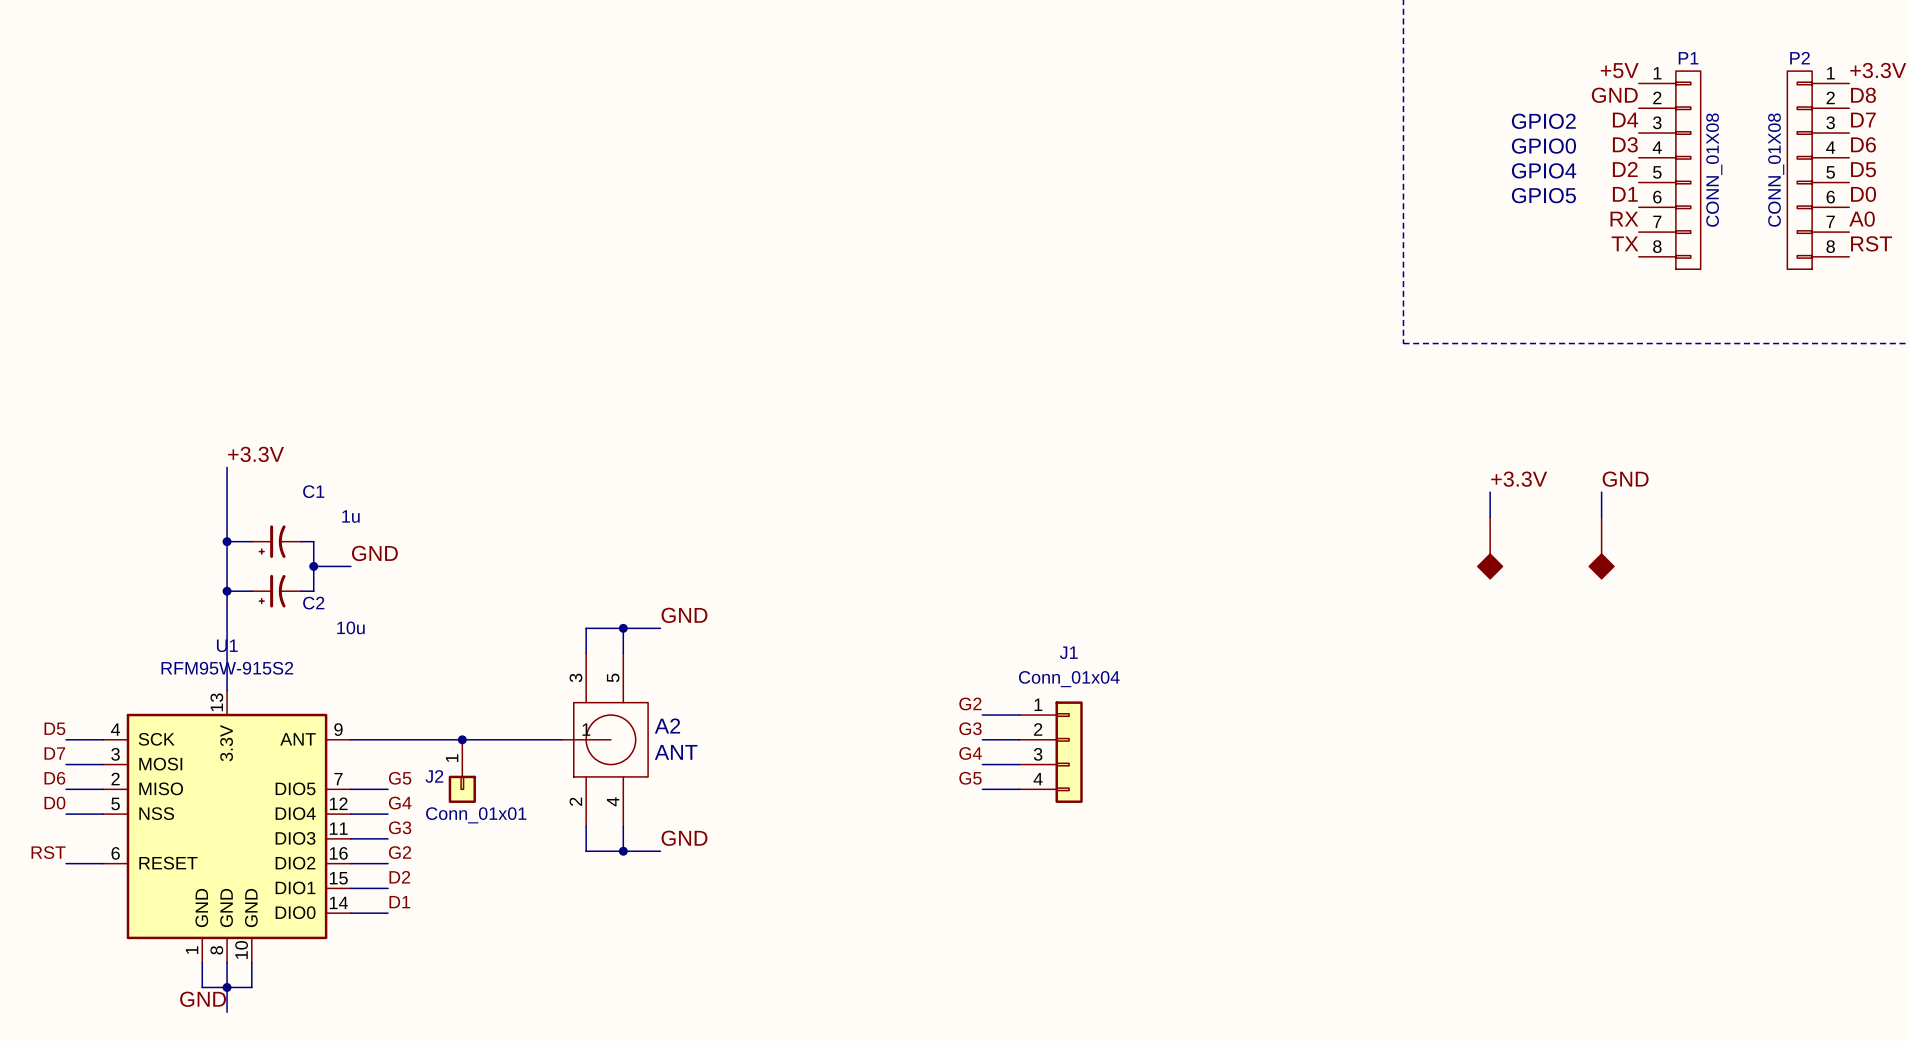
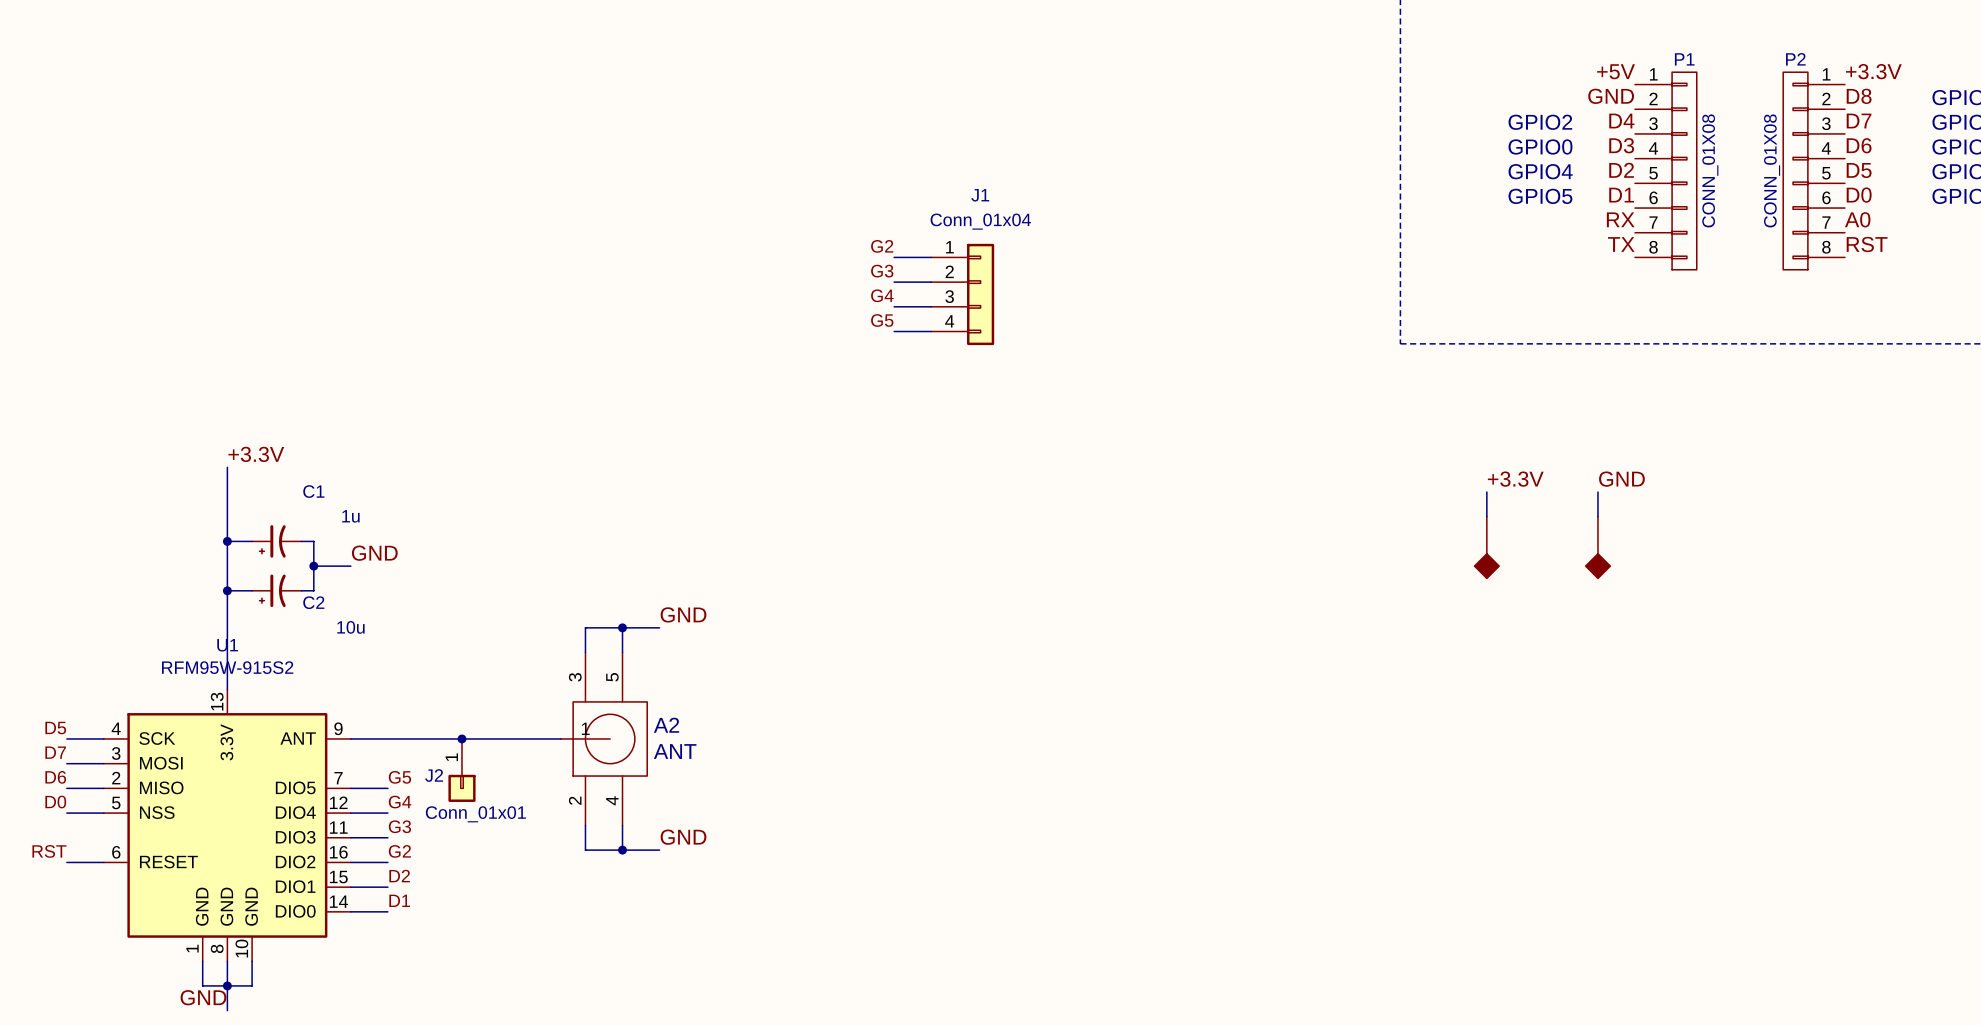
label: none -> G2 (882, 246)
wire: none -> (894, 257) (931, 257)
label: none -> G3 (882, 271)
wire: none -> (894, 282) (931, 282)
label: none -> G4 (882, 295)
wire: none -> (894, 306) (931, 306)
label: none -> G5 (882, 320)
wire: none -> (894, 331) (931, 331)
label: G2 (970, 703) -> none
wire: (982, 715) (1019, 715) -> none
label: G3 (970, 728) -> none
wire: (982, 739) (1019, 739) -> none
J1 position: (1051, 752) -> (962, 294)
label: G4 (970, 753) -> none
wire: (982, 764) (1019, 764) -> none
label: G5 (970, 778) -> none
wire: (982, 789) (1019, 789) -> none

